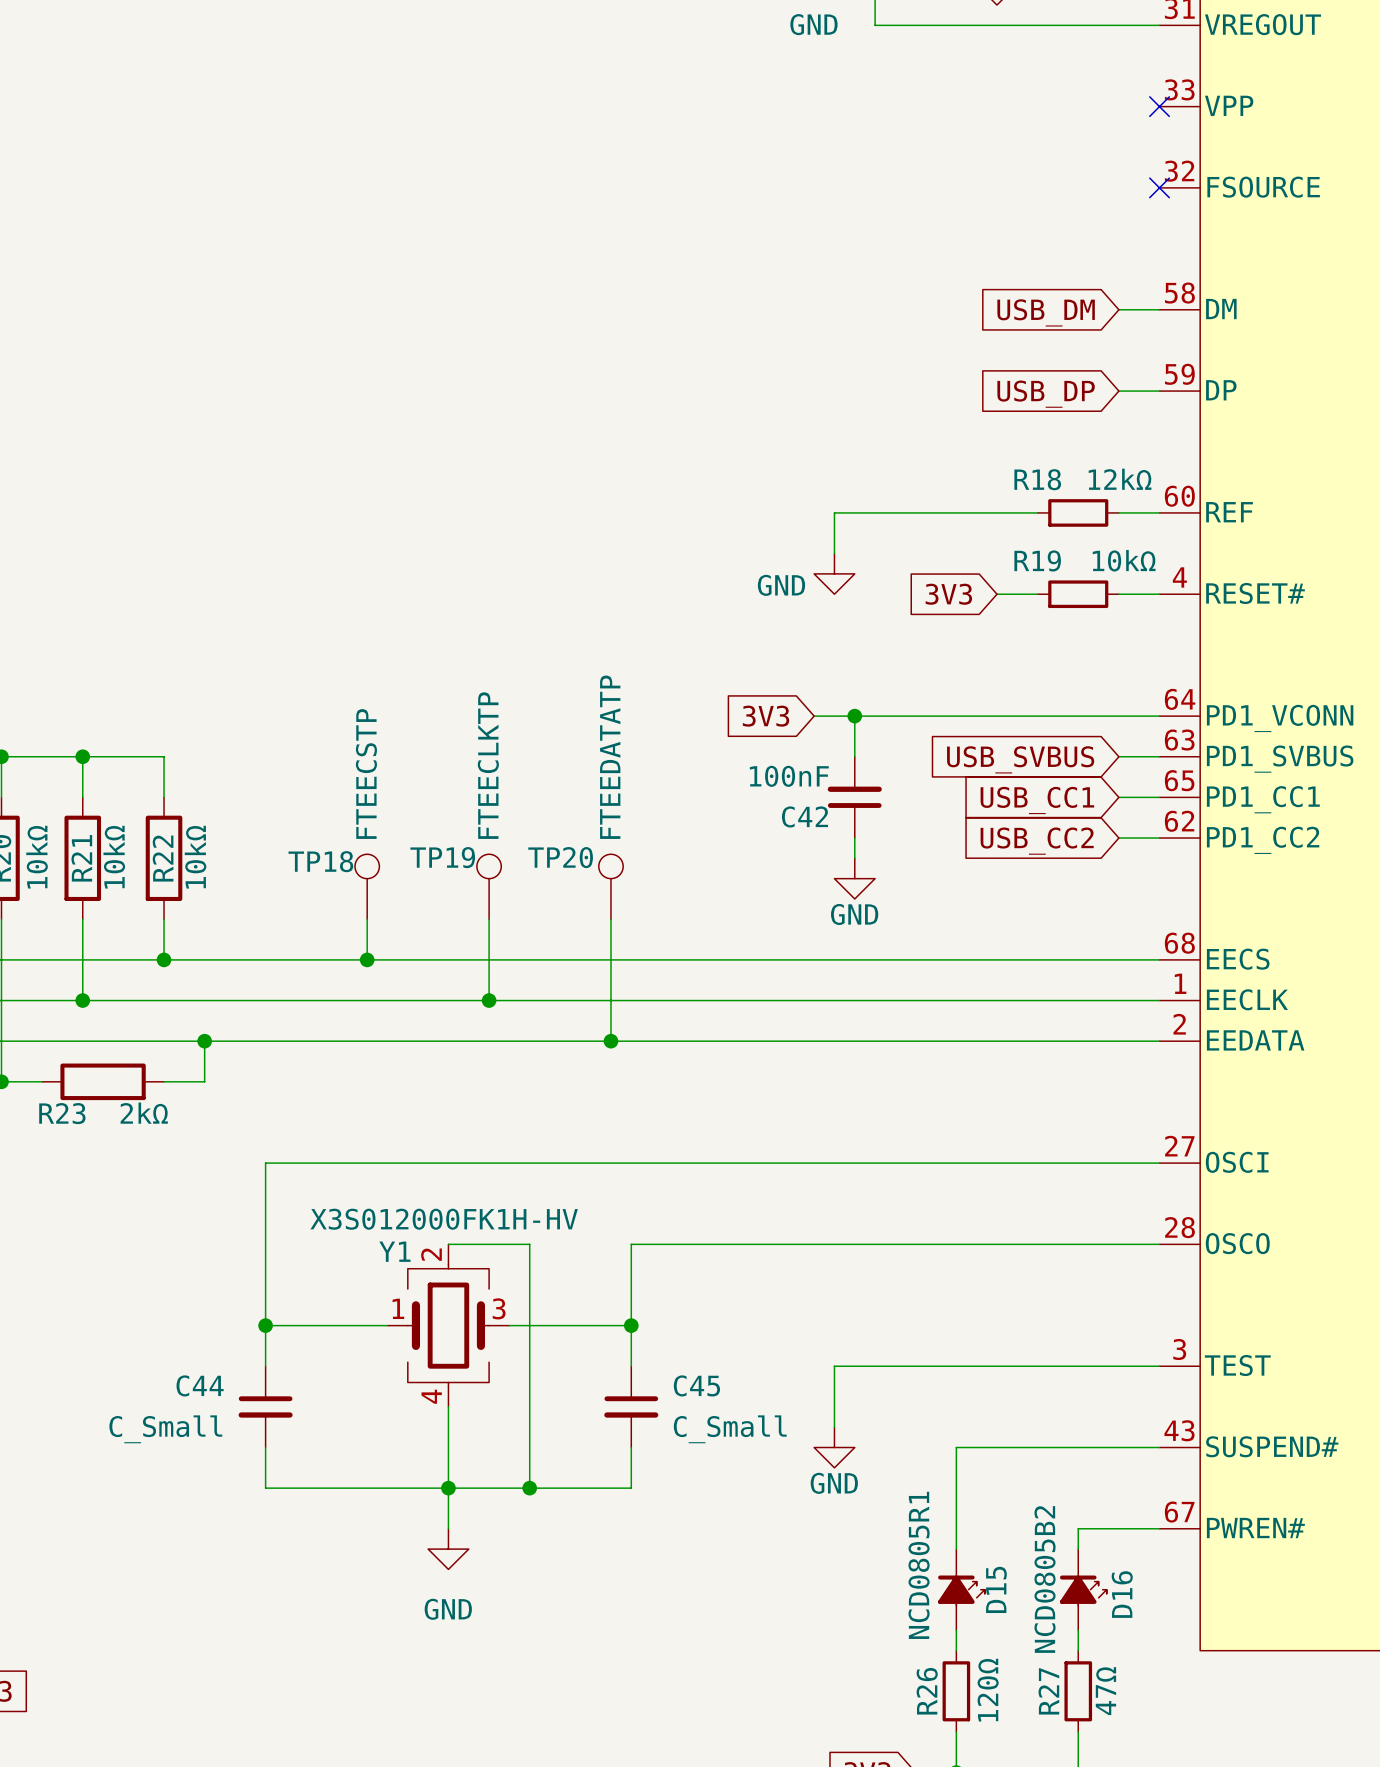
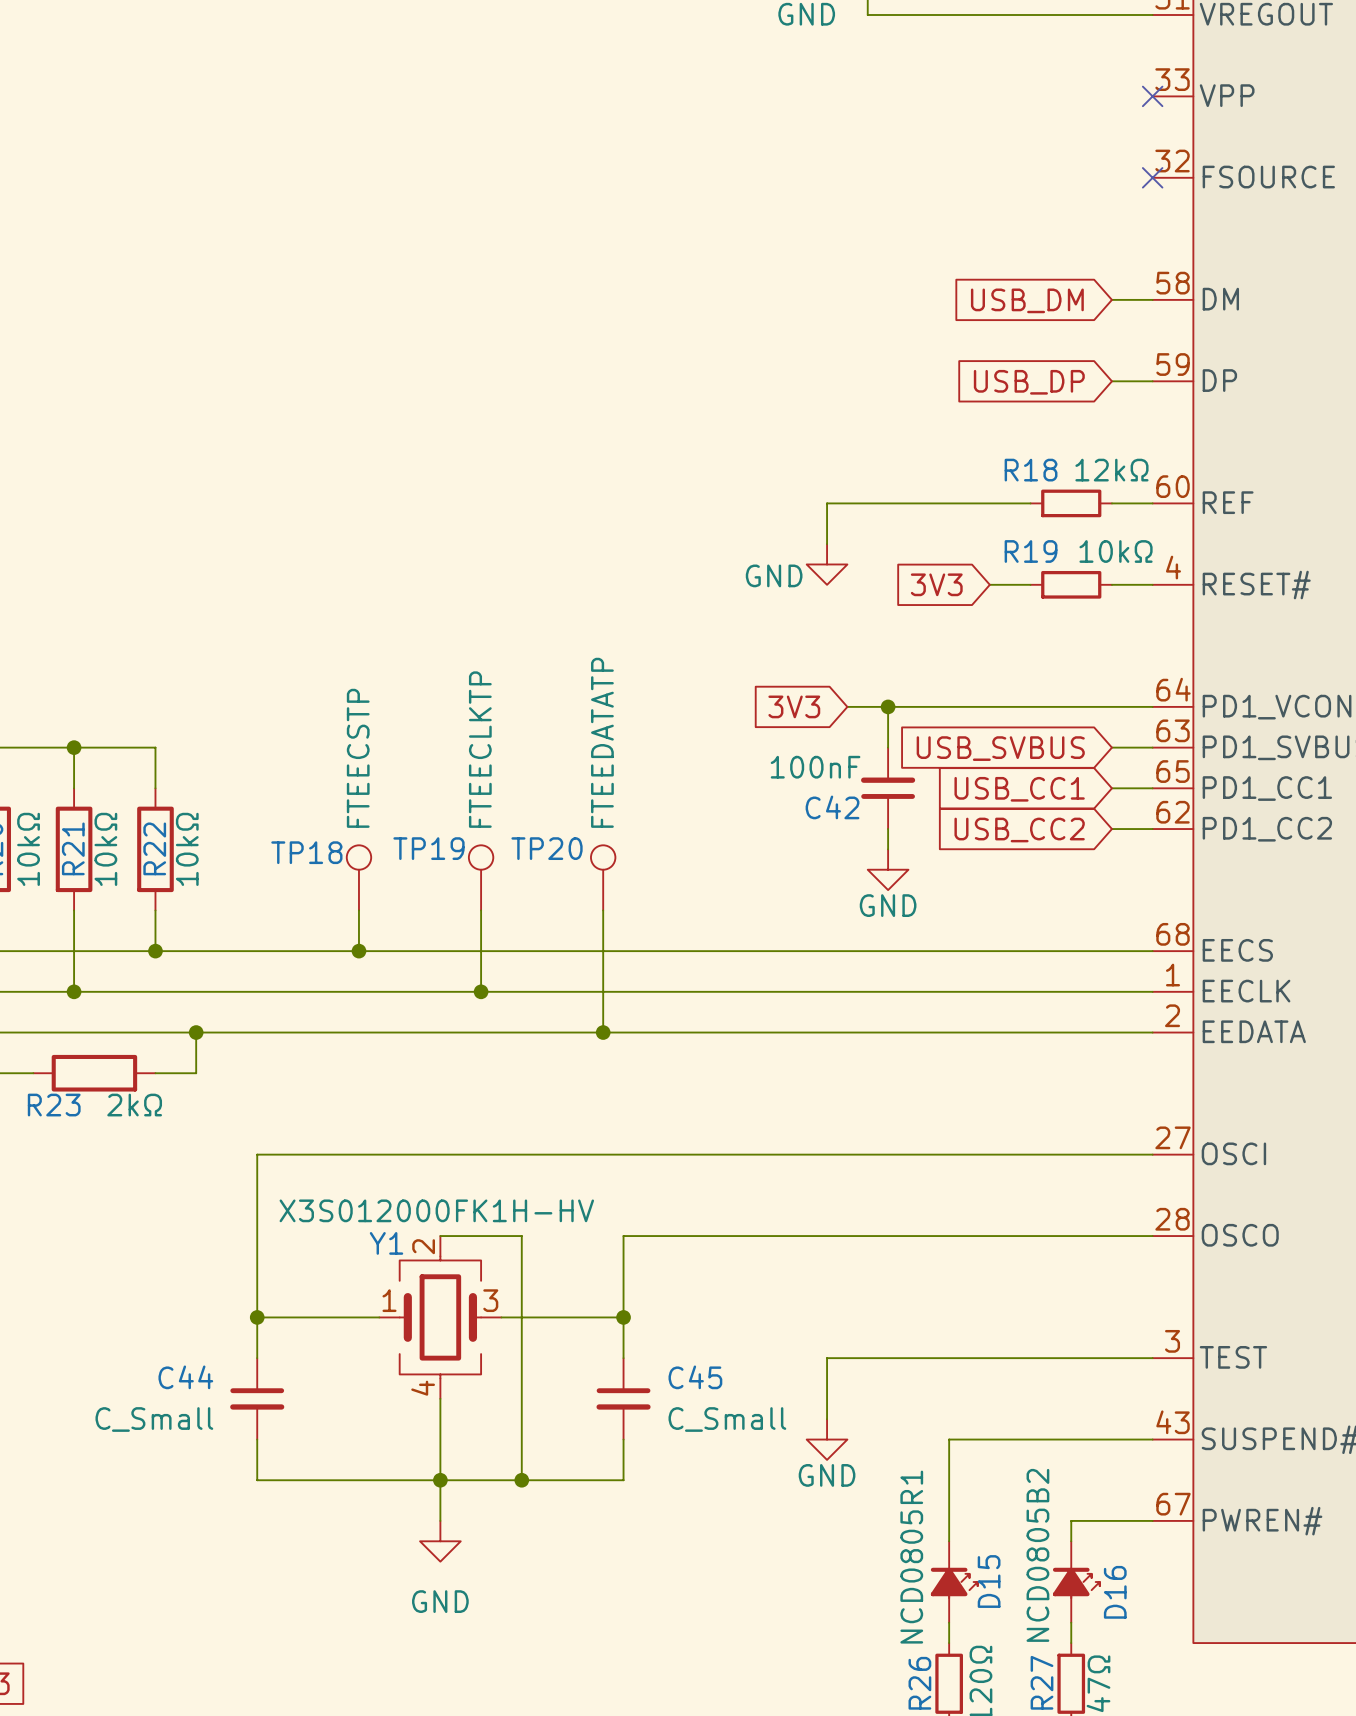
global label position: 3V3 (766, 716) -> 3V3 (794, 706)
wire: (814, 716) (854, 716) (854, 756) -> none
junction position: (854, 716) -> (888, 706)
wire: none -> (888, 706) (888, 747)
C42 position: (854, 797) -> (888, 788)
wire: (854, 838) (854, 858) -> (888, 829) (888, 849)
power symbol position: GND (854, 878) -> GND (888, 869)

